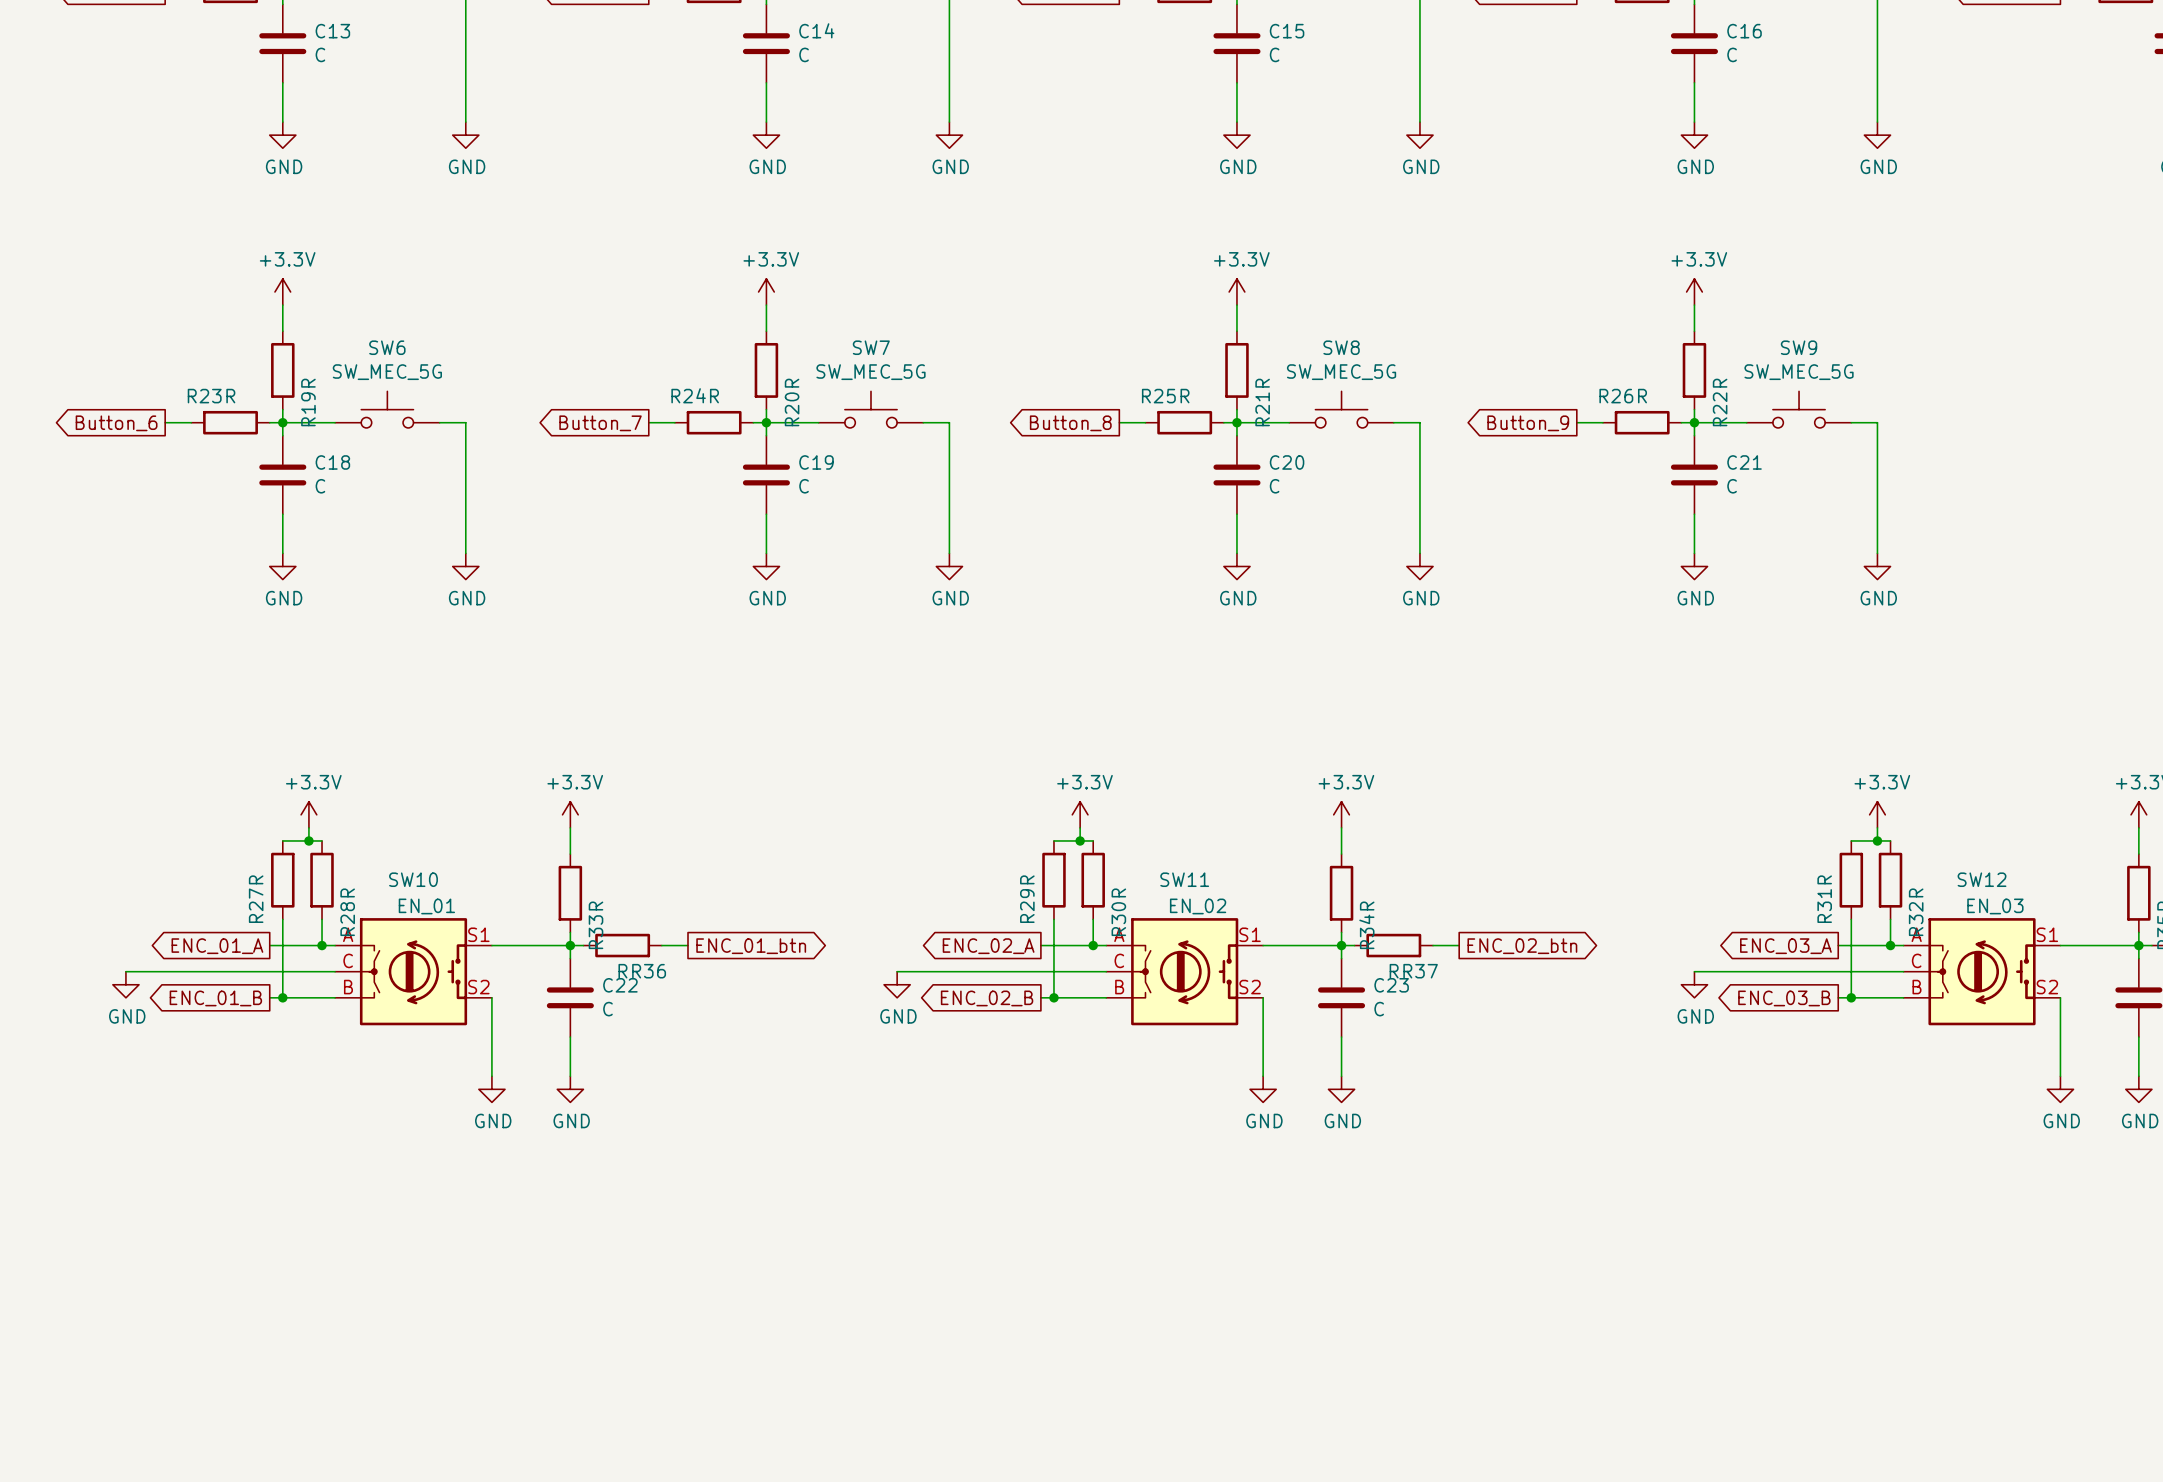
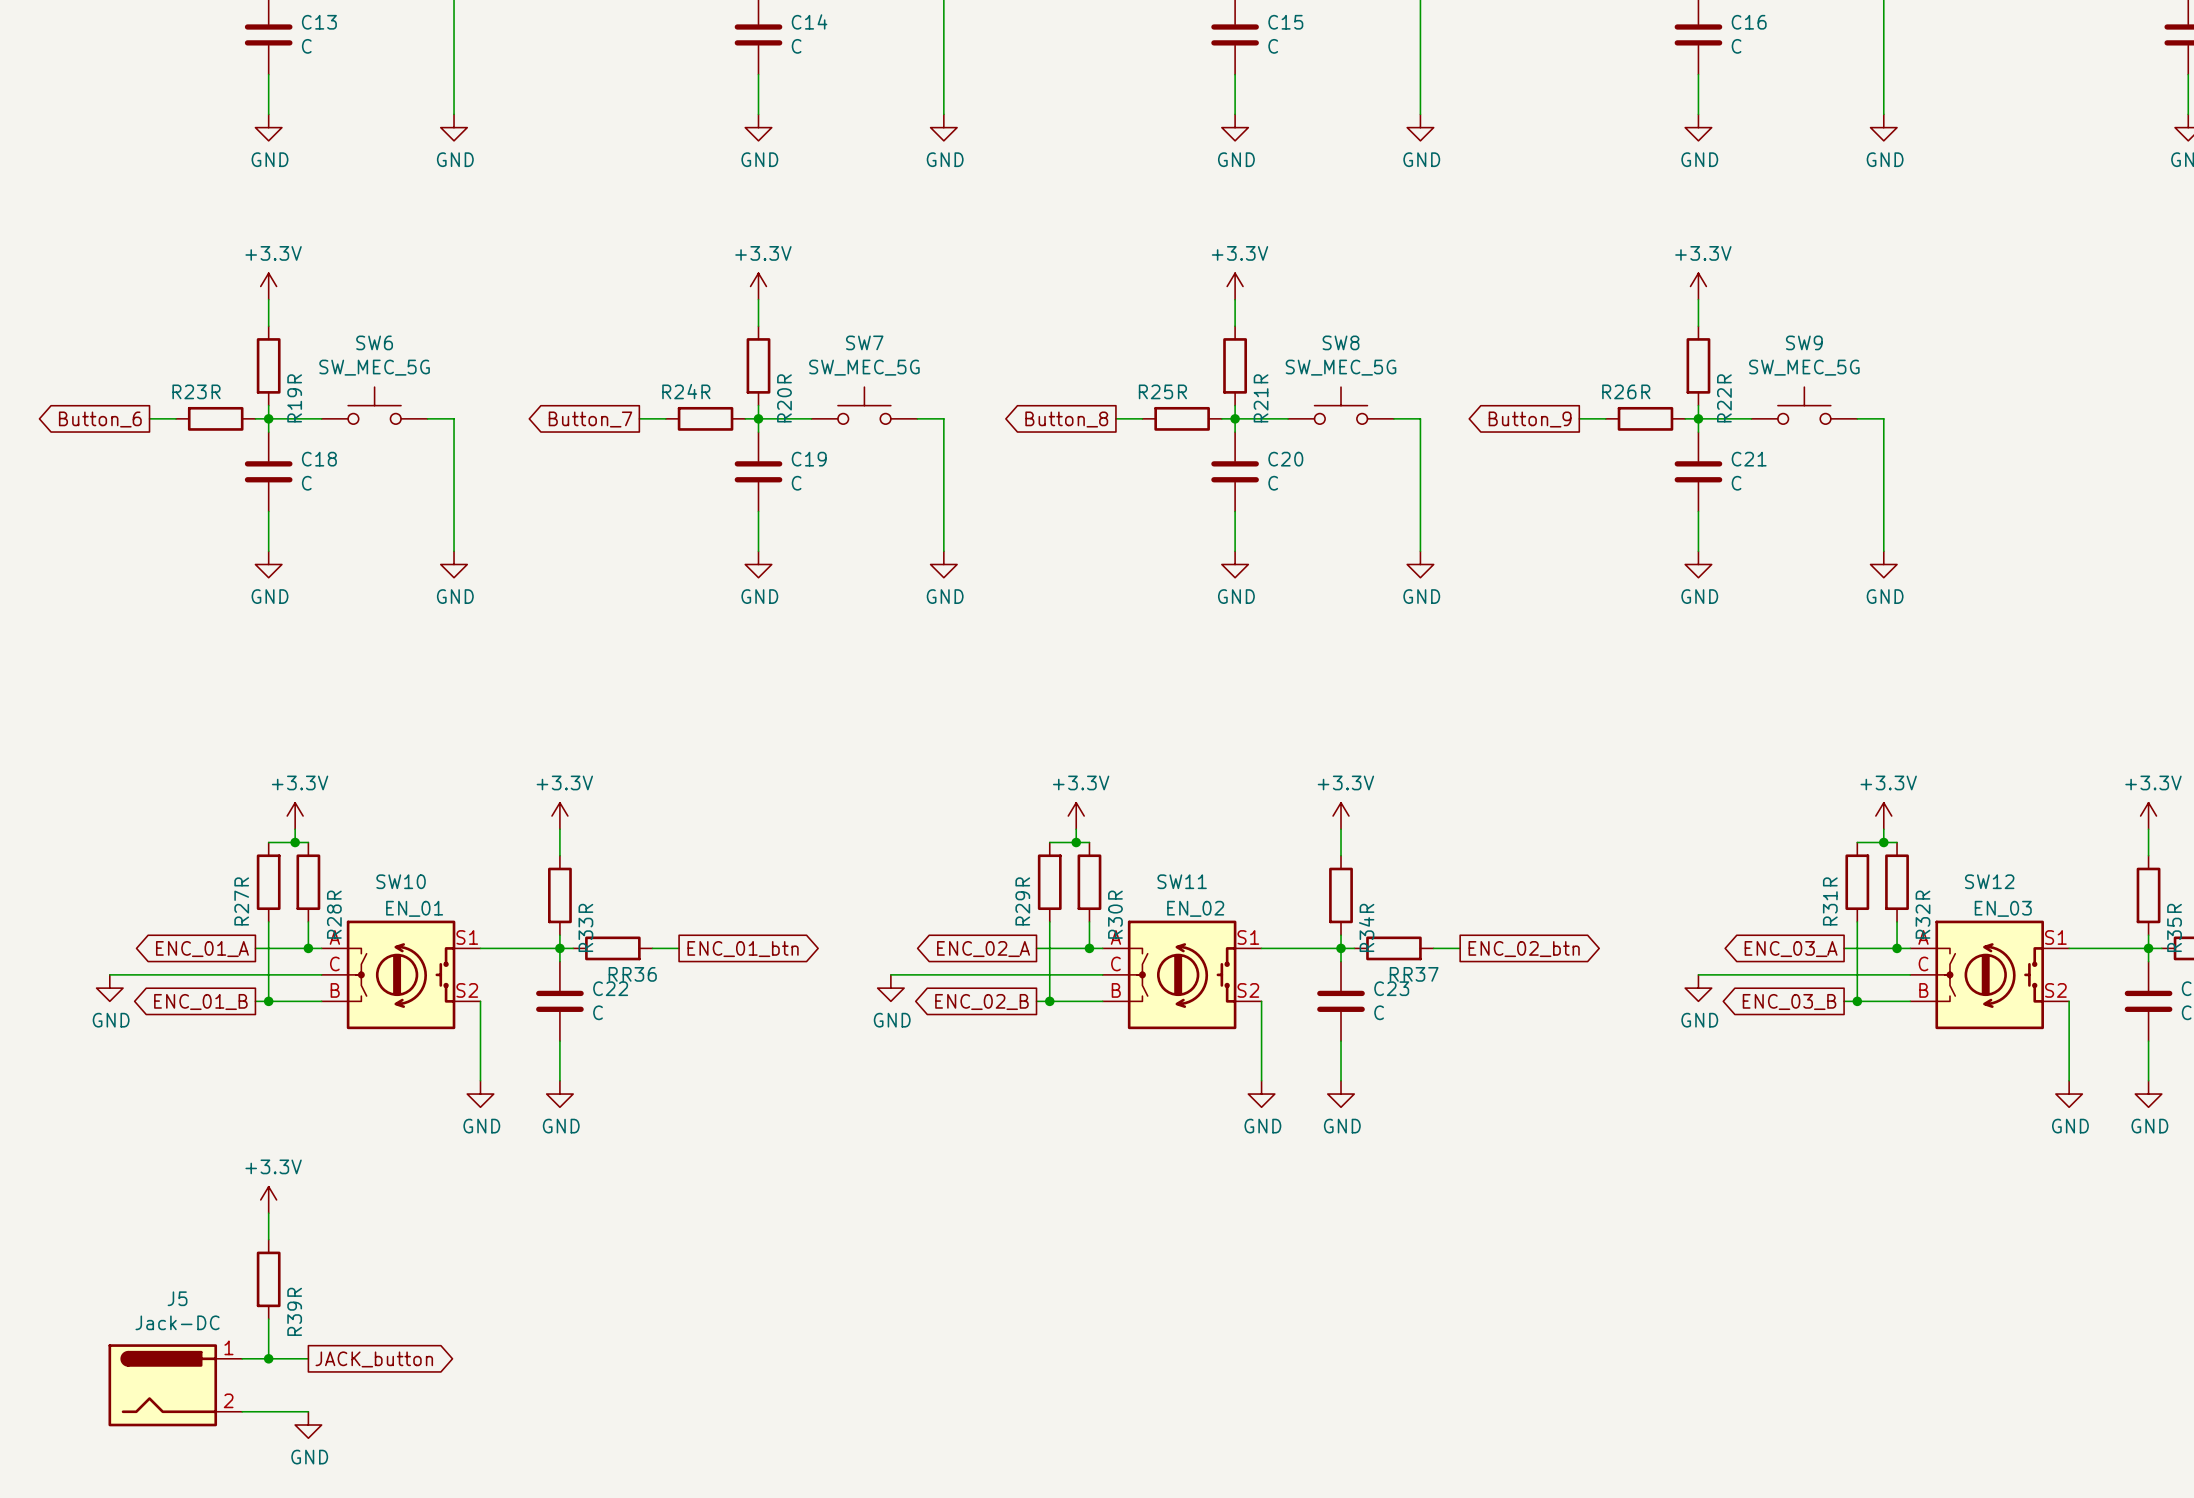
power symbol: none -> +3.3V (268, 1199)
wire: none -> (268, 1213) (268, 1239)
R39: none -> R (268, 1279)
wire: none -> (268, 1319) (268, 1358)
wire: none -> (242, 1358) (308, 1358)
junction: none -> (268, 1358)
global label: none -> JACK_button (374, 1359)
J5: none -> Jack-DC (175, 1385)
wire: none -> (242, 1411) (308, 1411)
power symbol: none -> GND (308, 1425)

